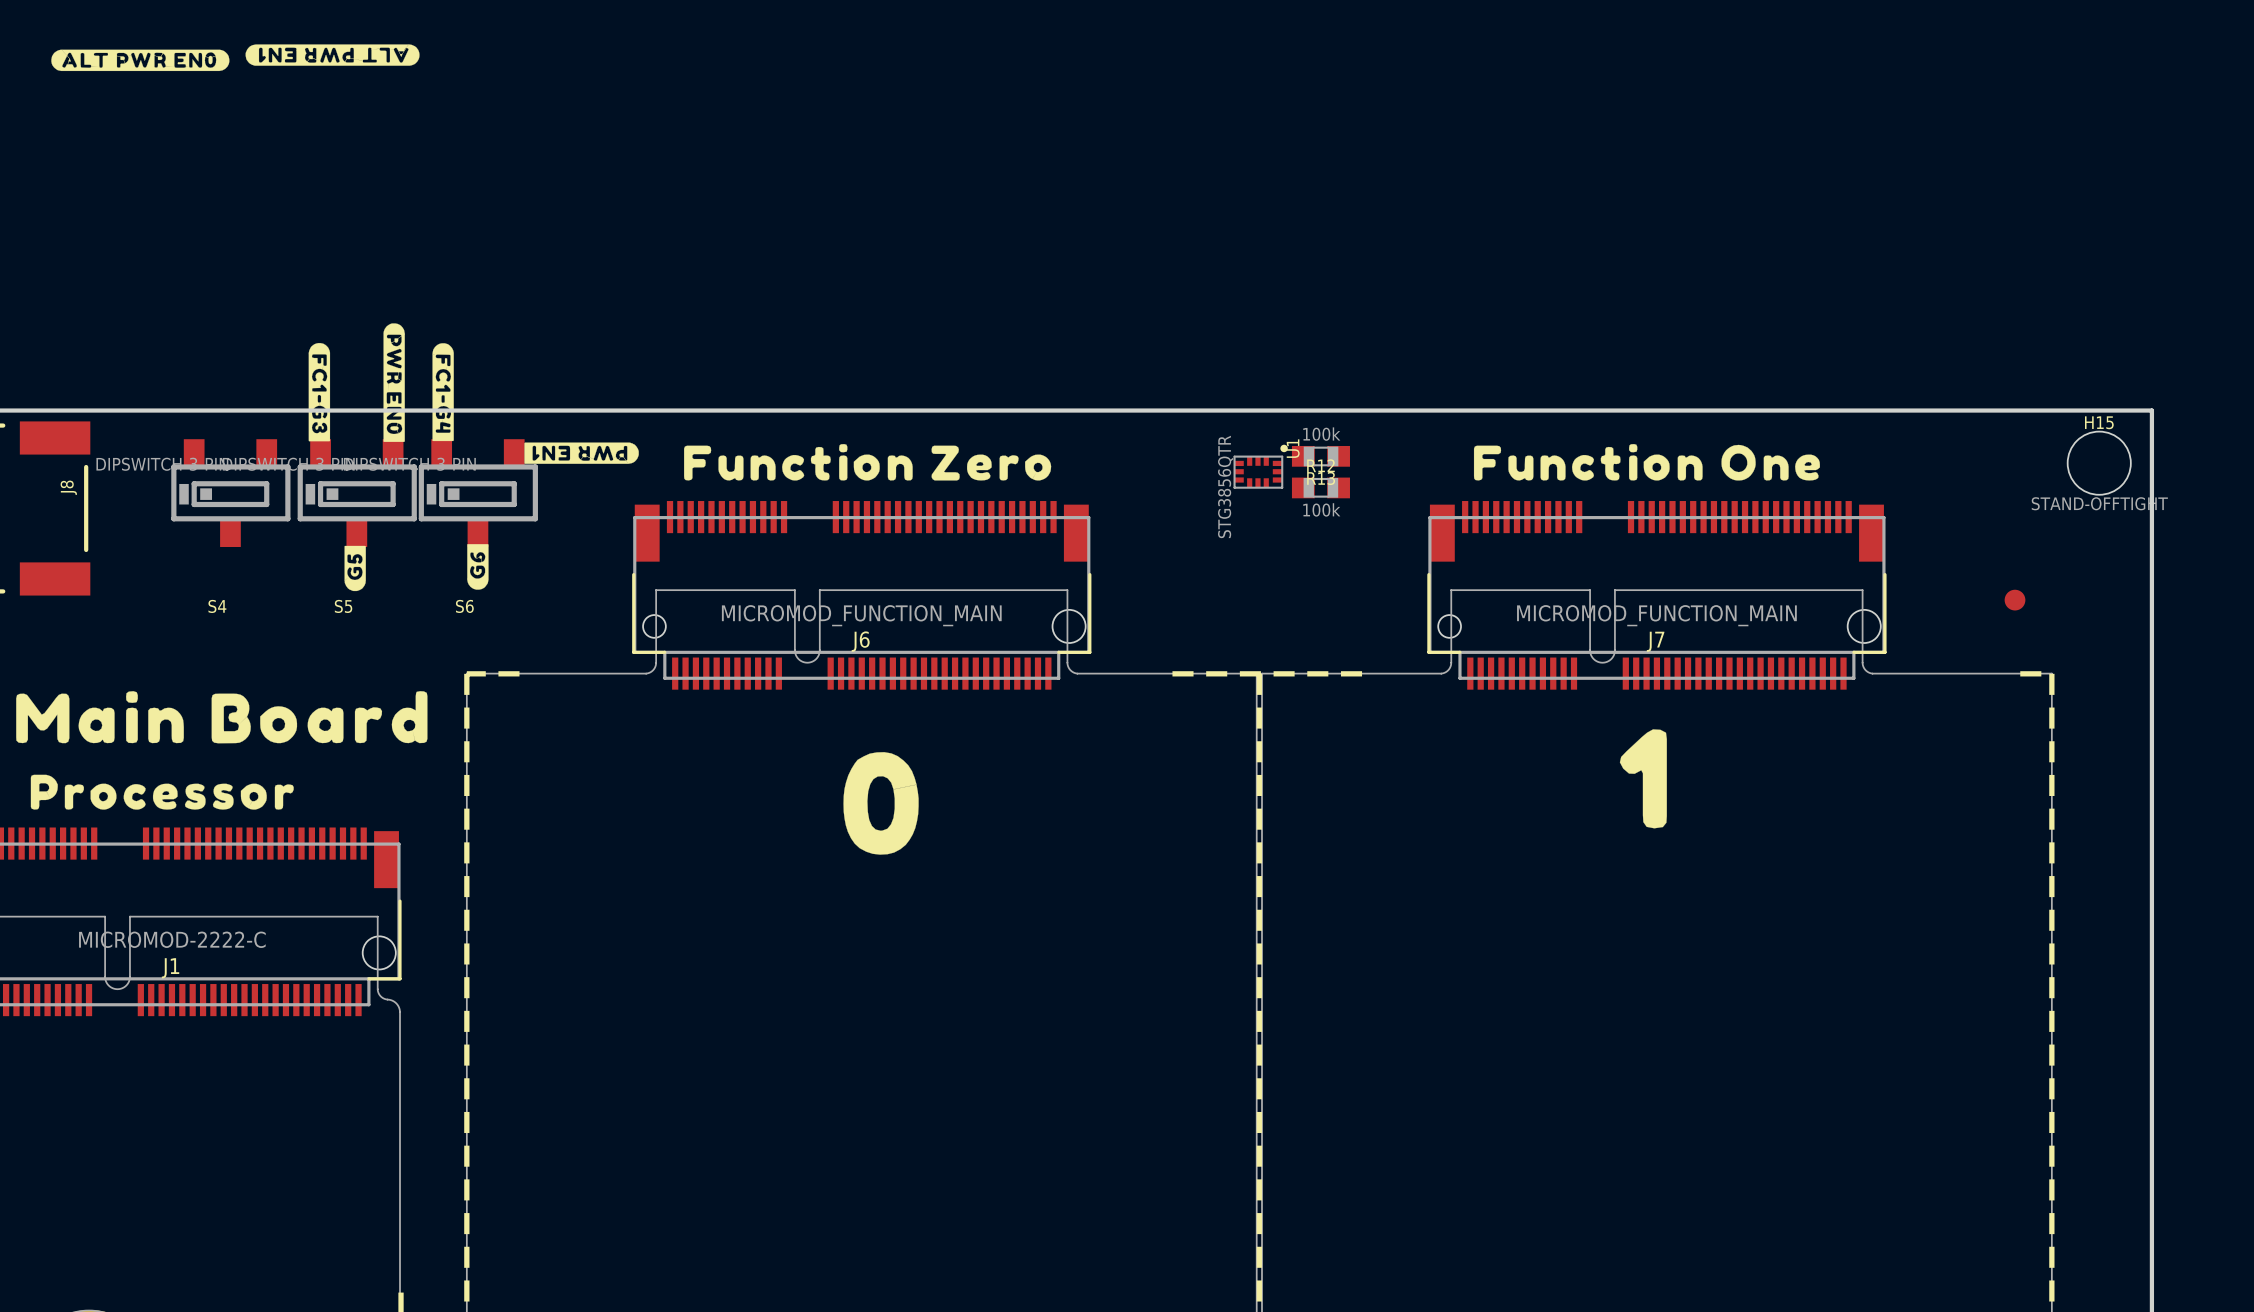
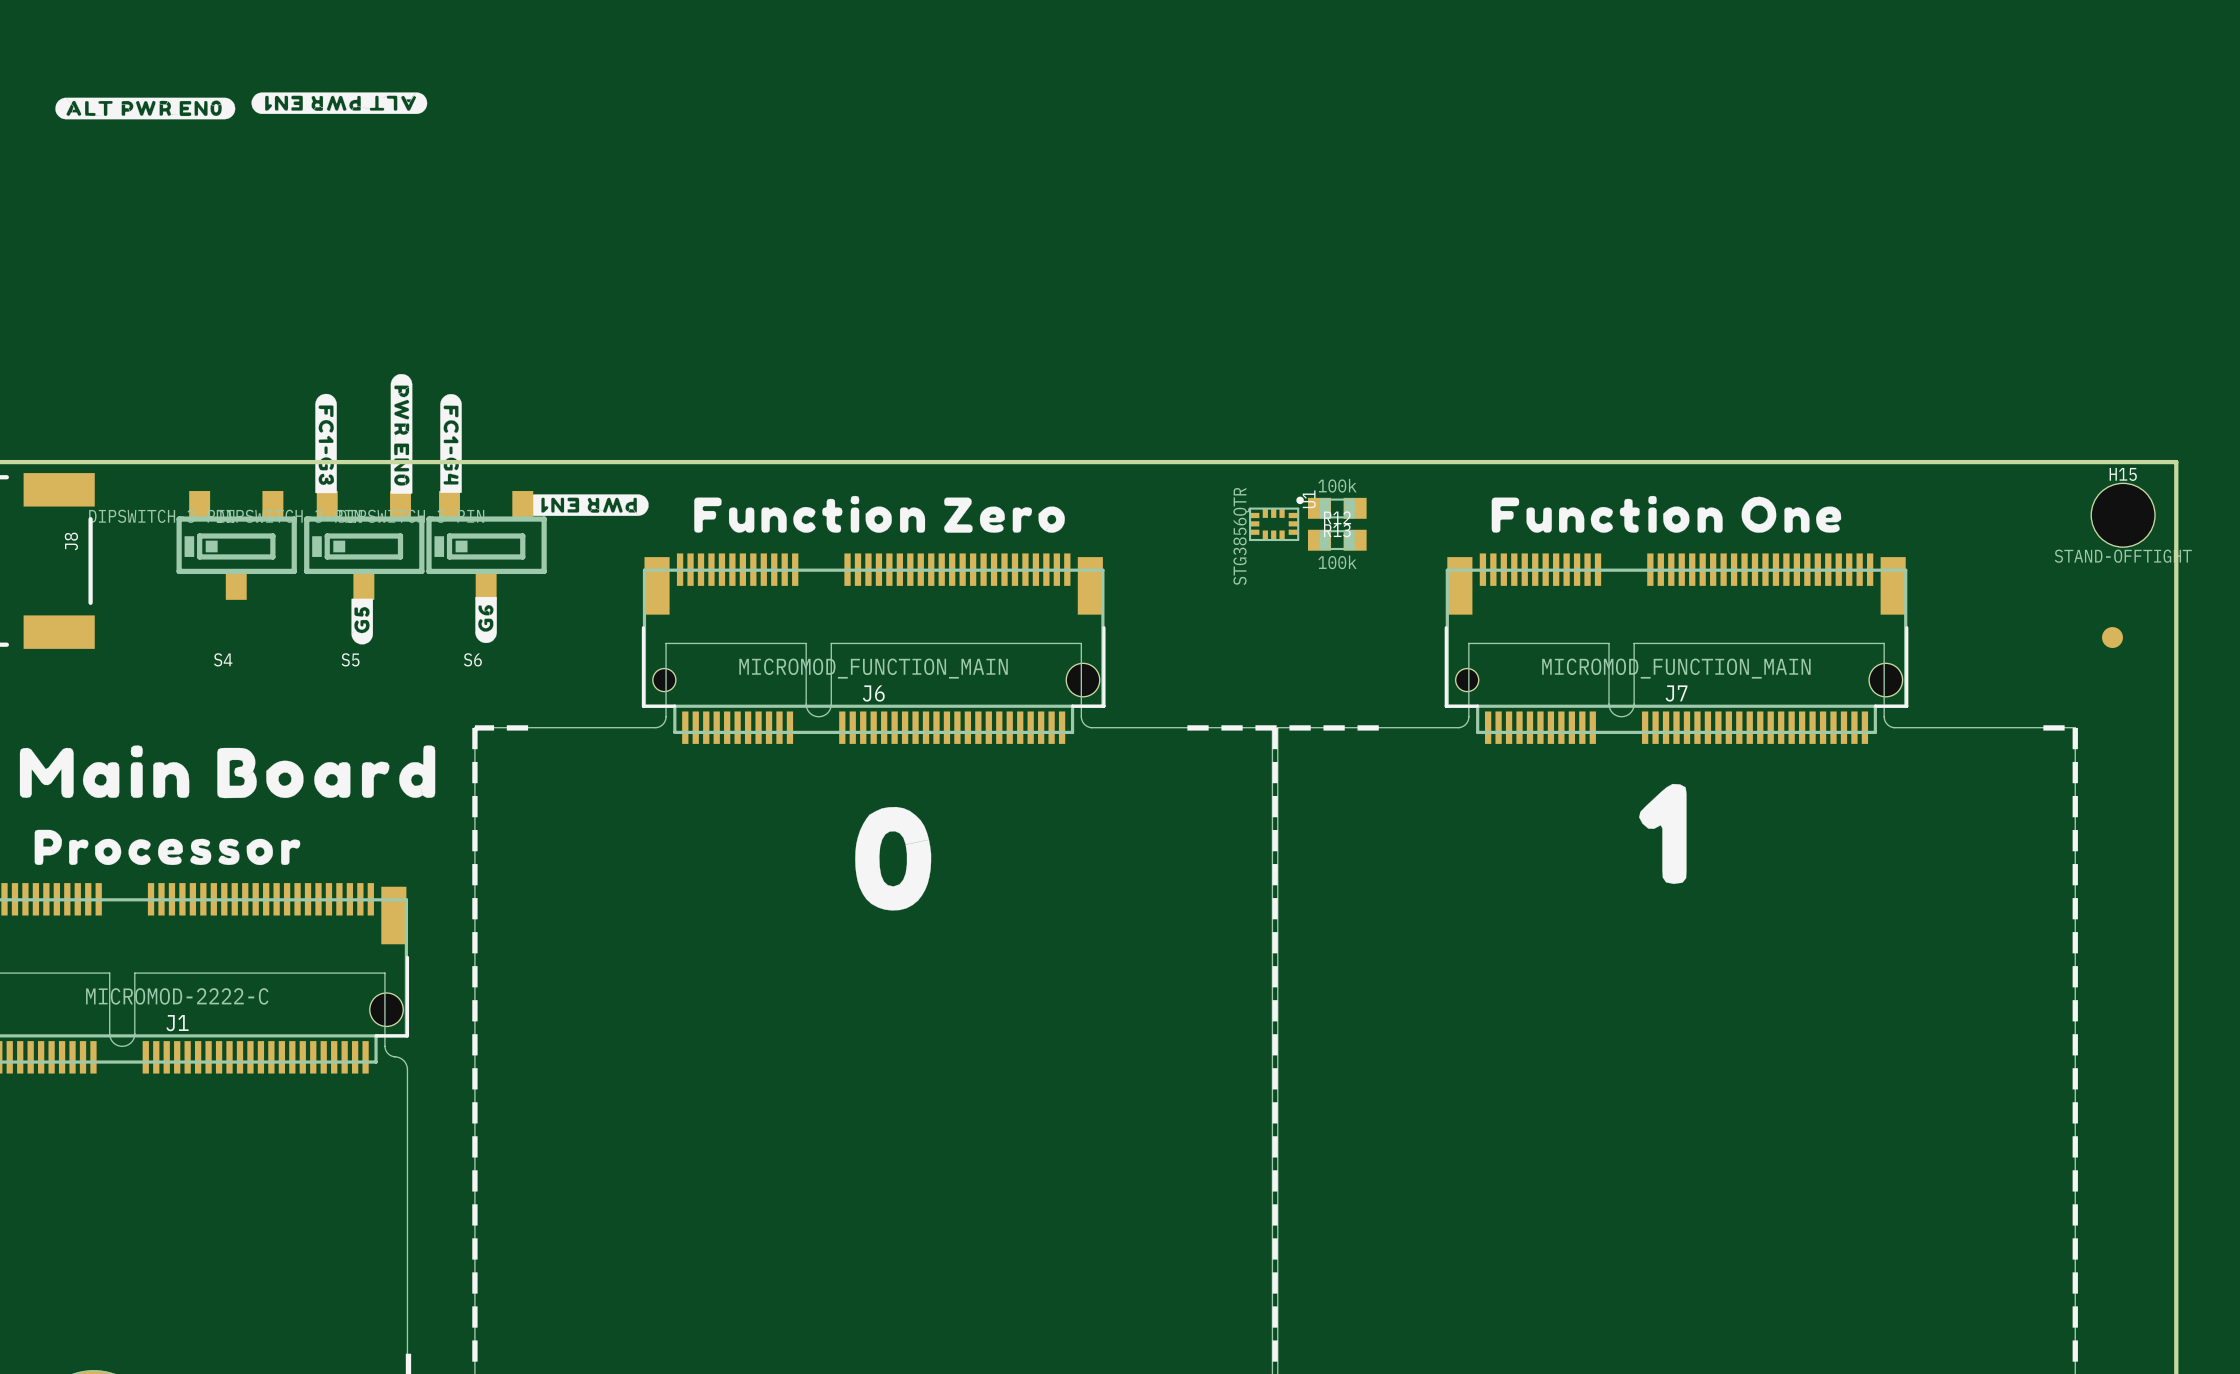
part position: (2015, 600) -> (2112, 637)

